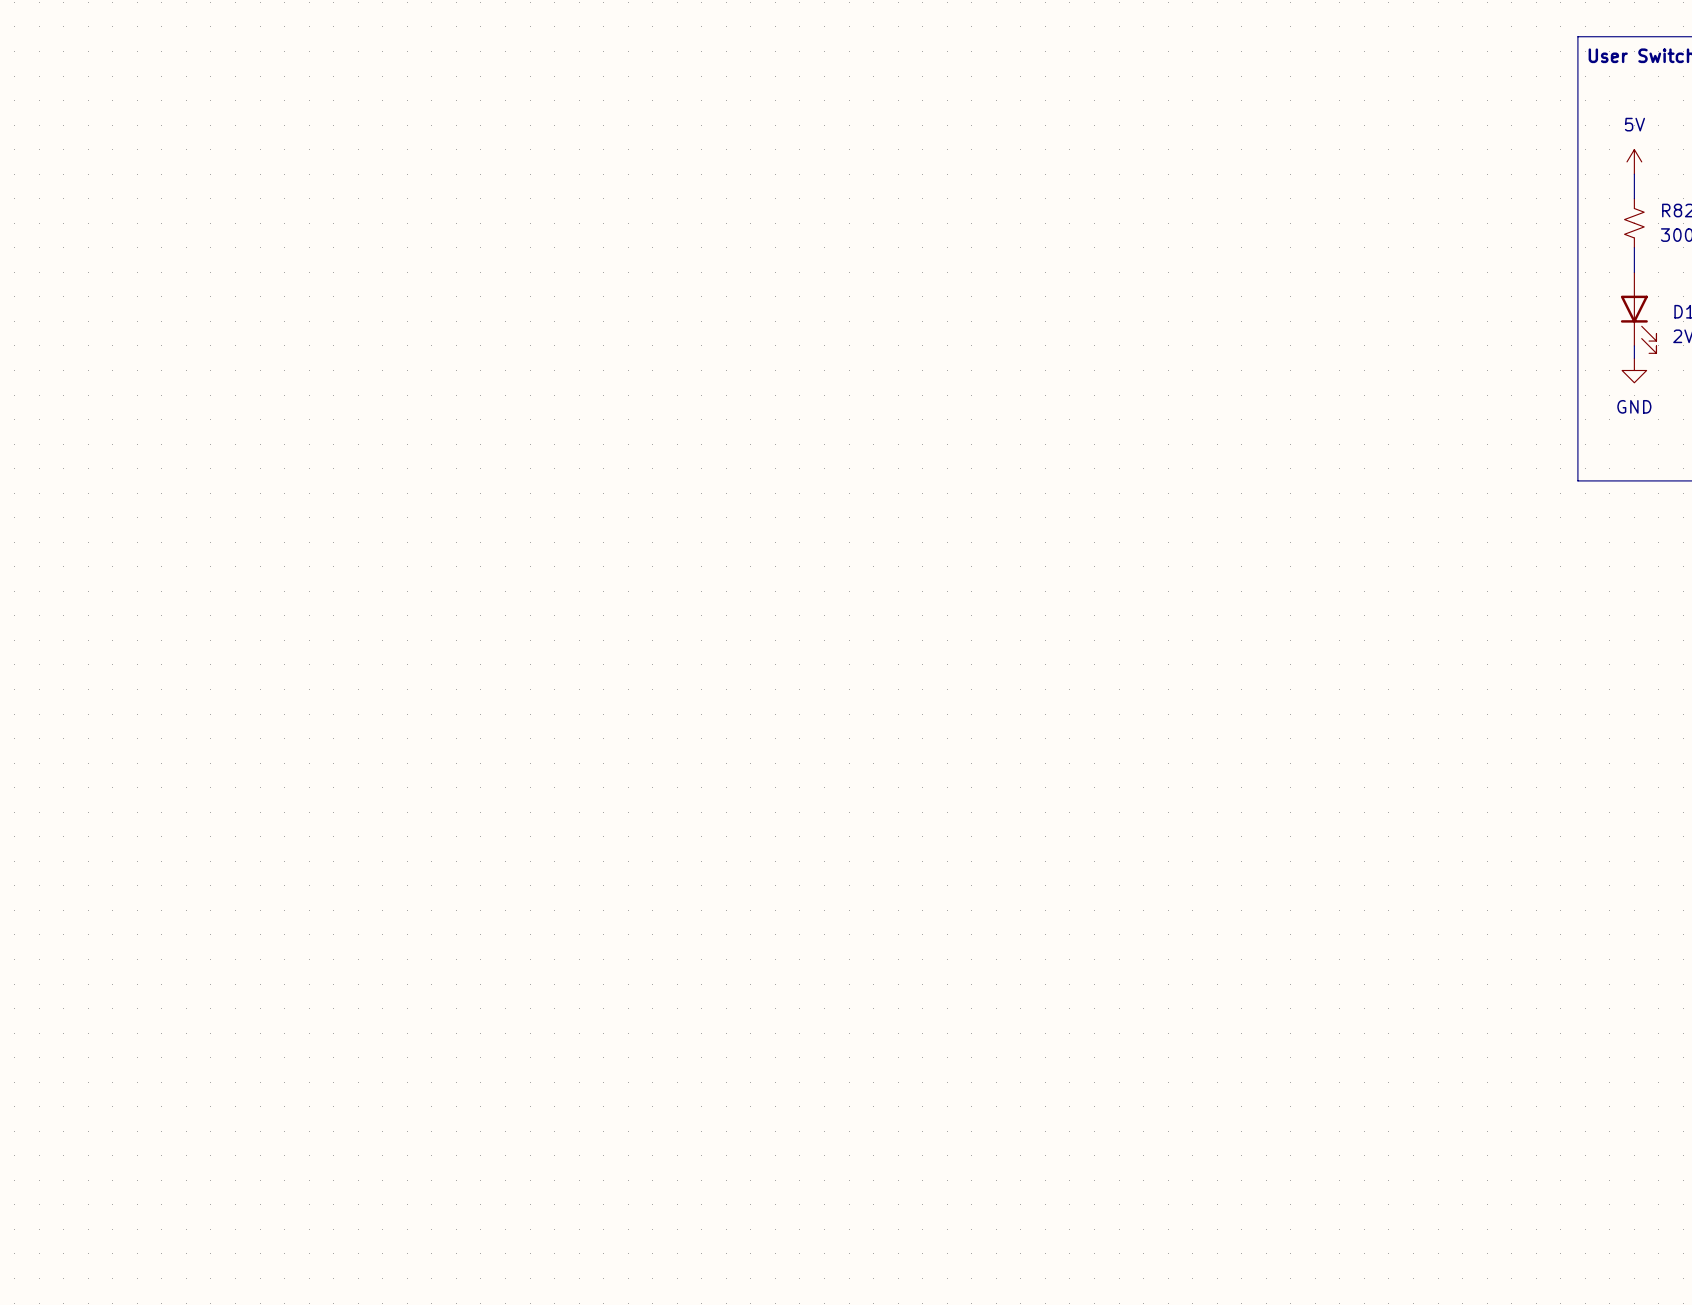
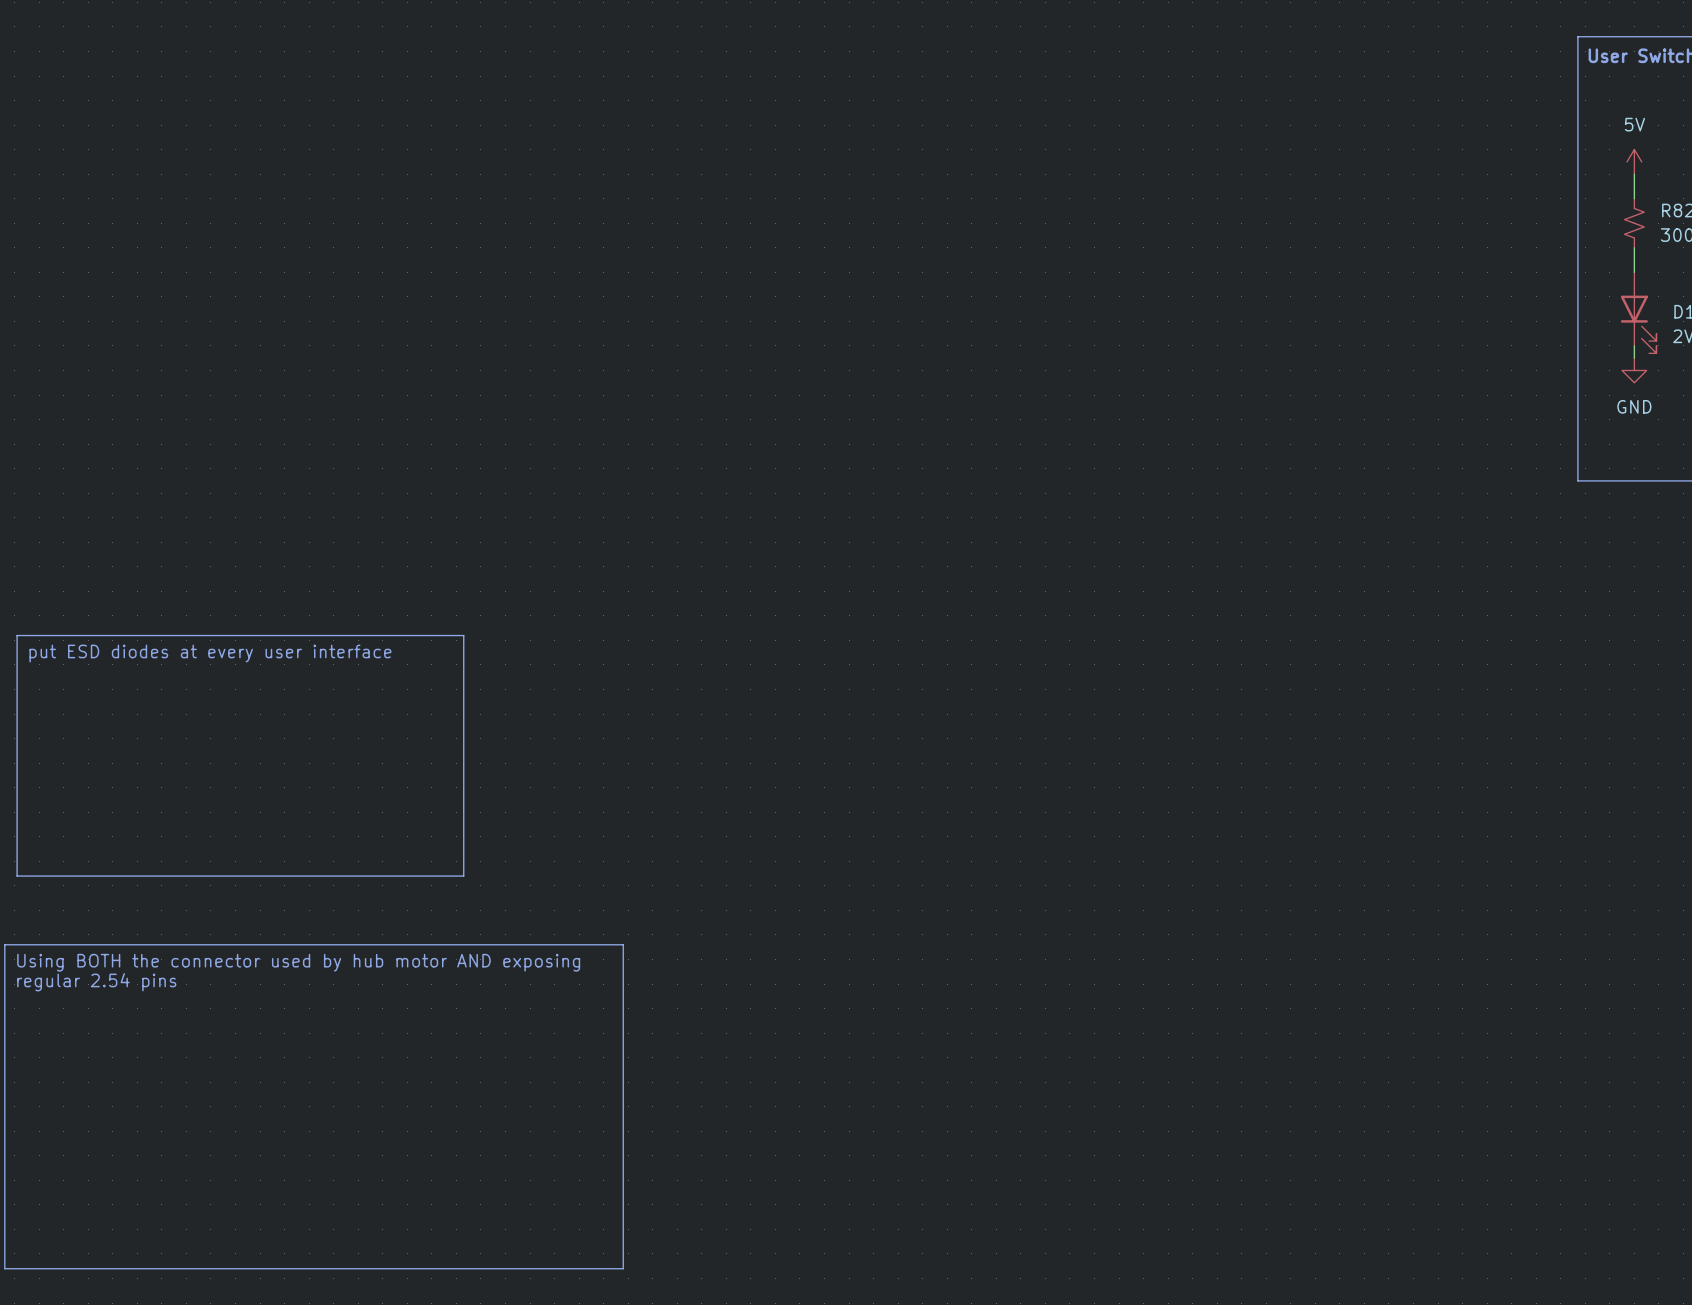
line: none -> (17, 635) (463, 635) (463, 876) (17, 876) (17, 635)
text: none -> put ESD diodes at every user interface (210, 653)
line: none -> (4, 944) (623, 944) (623, 1268) (4, 1268) (4, 944)
text: none -> Using BOTH the connector used by hub motor AND exposing (298, 962)
text: none -> regular 2.54 pins (96, 982)

